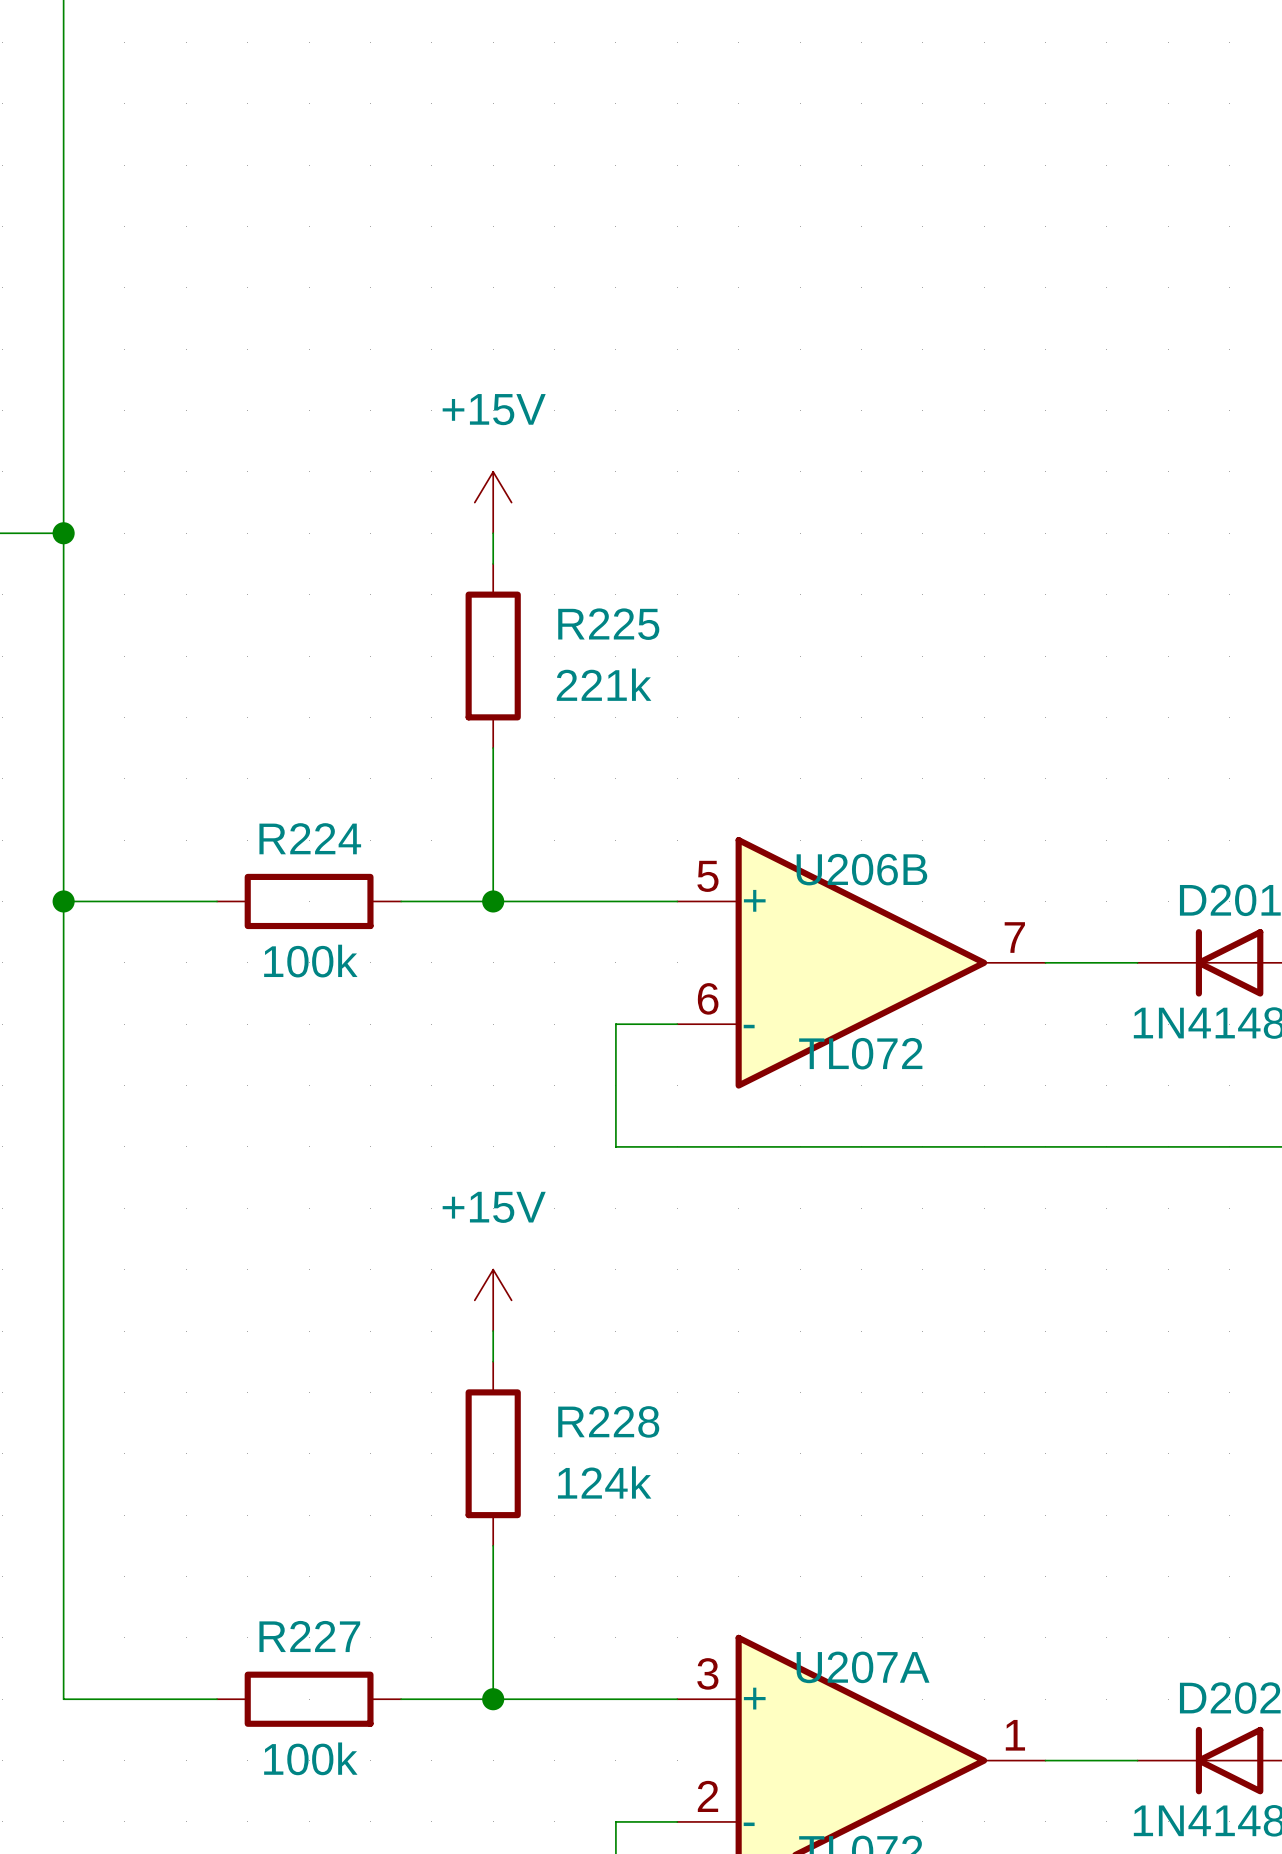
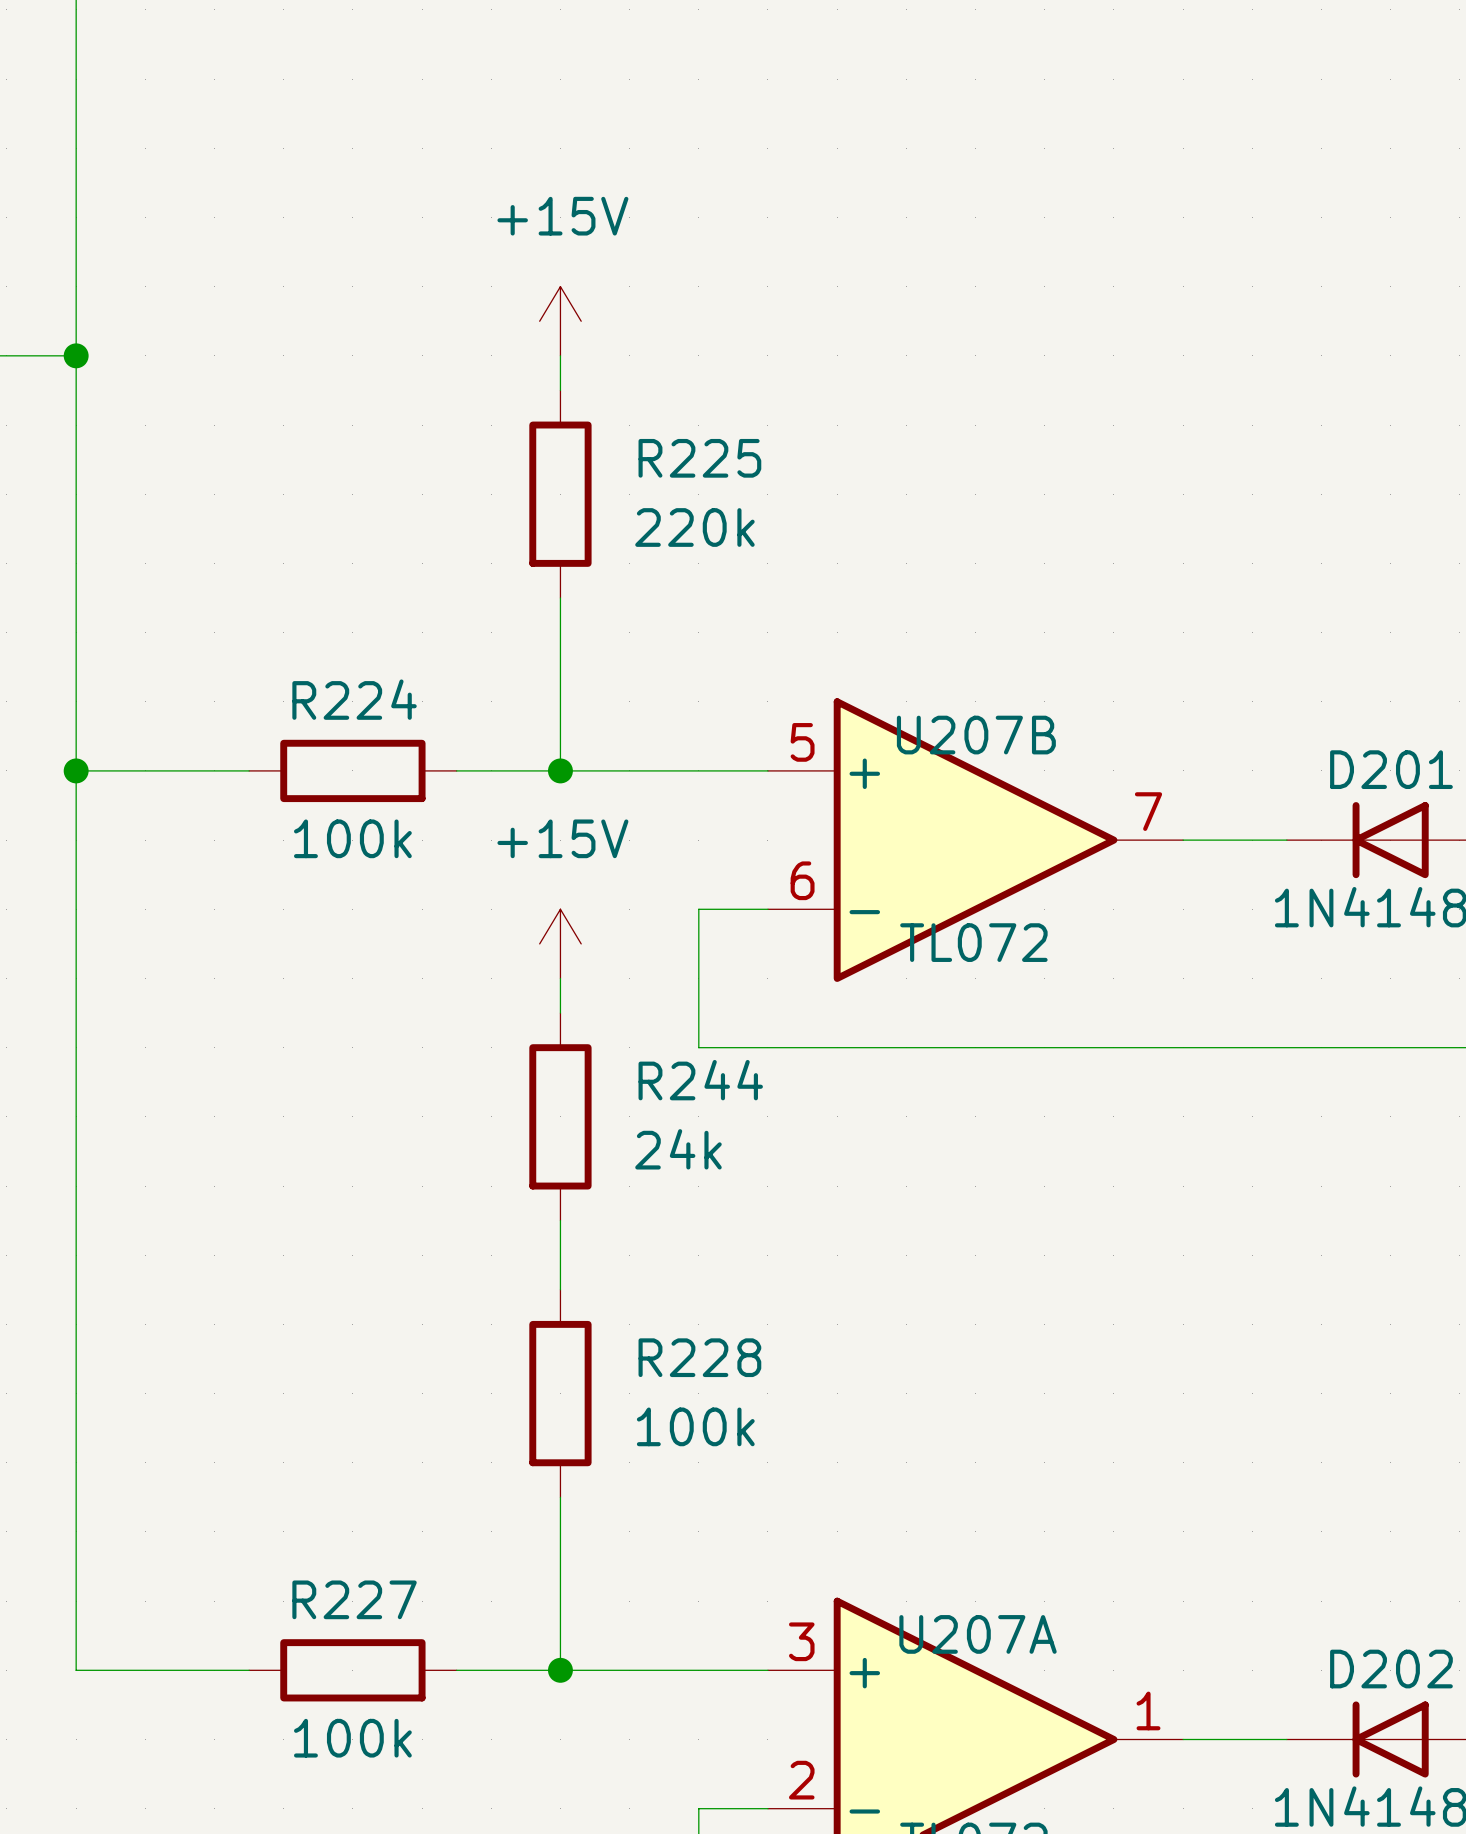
R225 value: 221k (604, 684) -> 220k (694, 527)
U206B name: U206B (861, 869) -> U207B (976, 735)
wire: none -> (560, 978) (560, 1013)
R244: none -> 24k (560, 1116)
power symbol position: +15V (493, 1300) -> +15V (560, 943)
R228 value: 124k (604, 1482) -> 100k (695, 1426)

